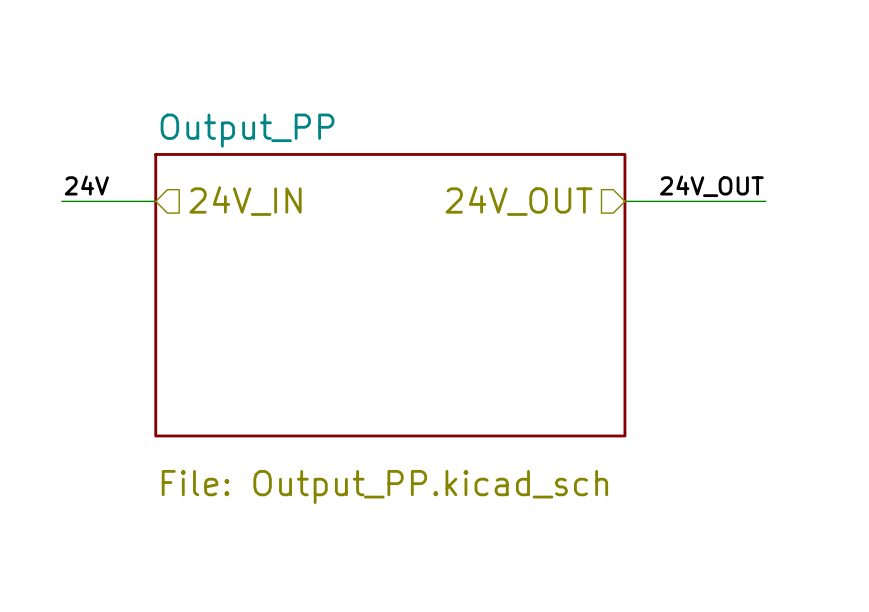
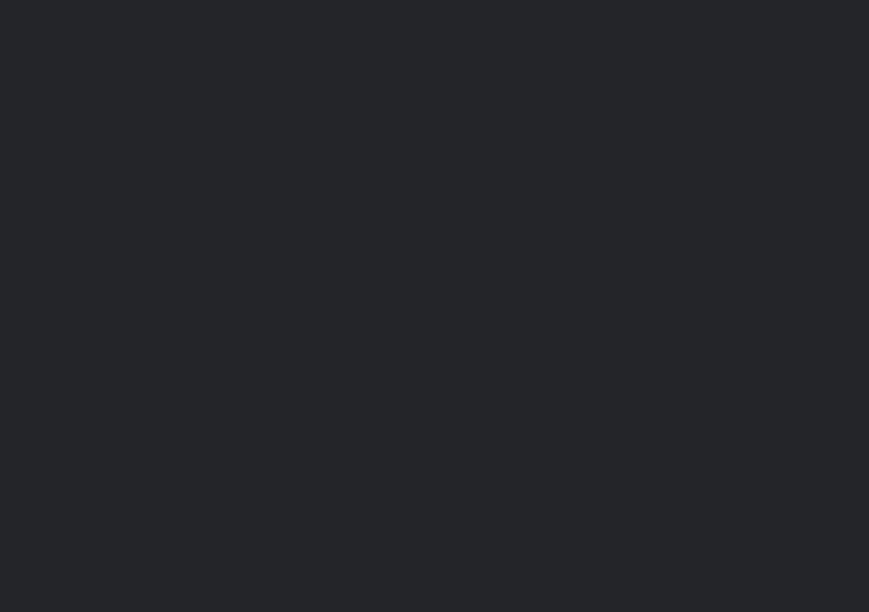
label: 24V (86, 185) -> none
label: 24V_OUT (711, 186) -> none
wire: (61, 201) (155, 201) -> none
hierarchical label: 24V_IN (245, 201) -> none
hierarchical label: 24V_OUT (519, 201) -> none
wire: (624, 201) (765, 201) -> none
sheet Output_PP: File: Output_PP.kicad_sch (390, 295) -> none

